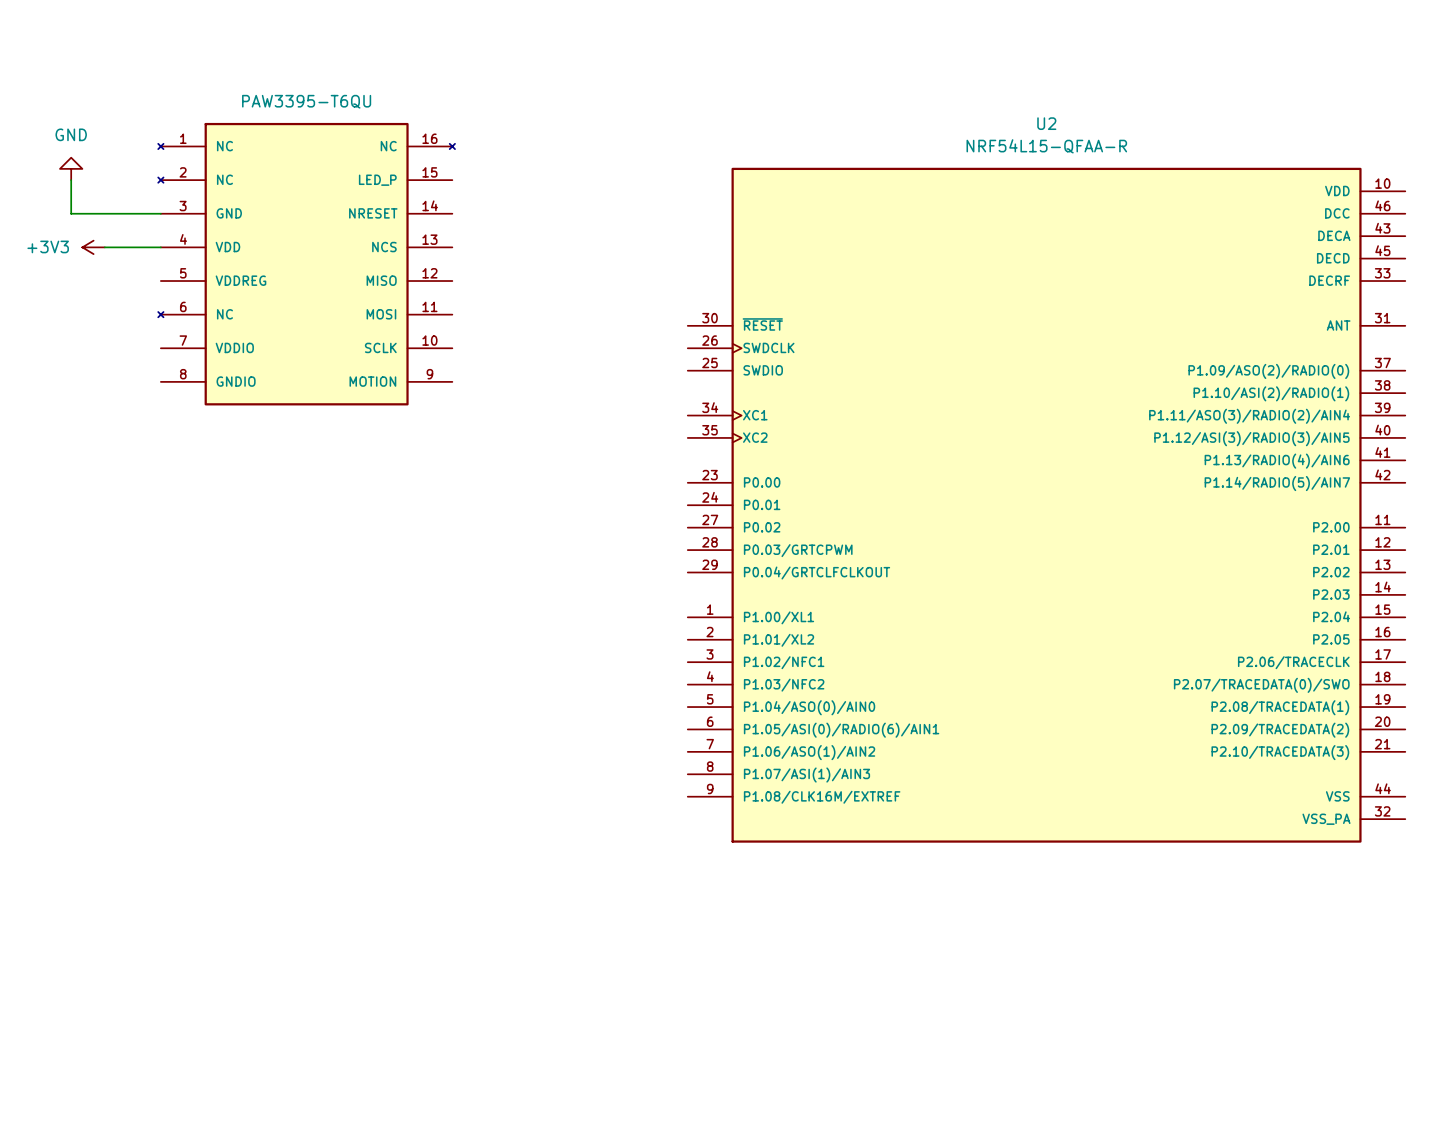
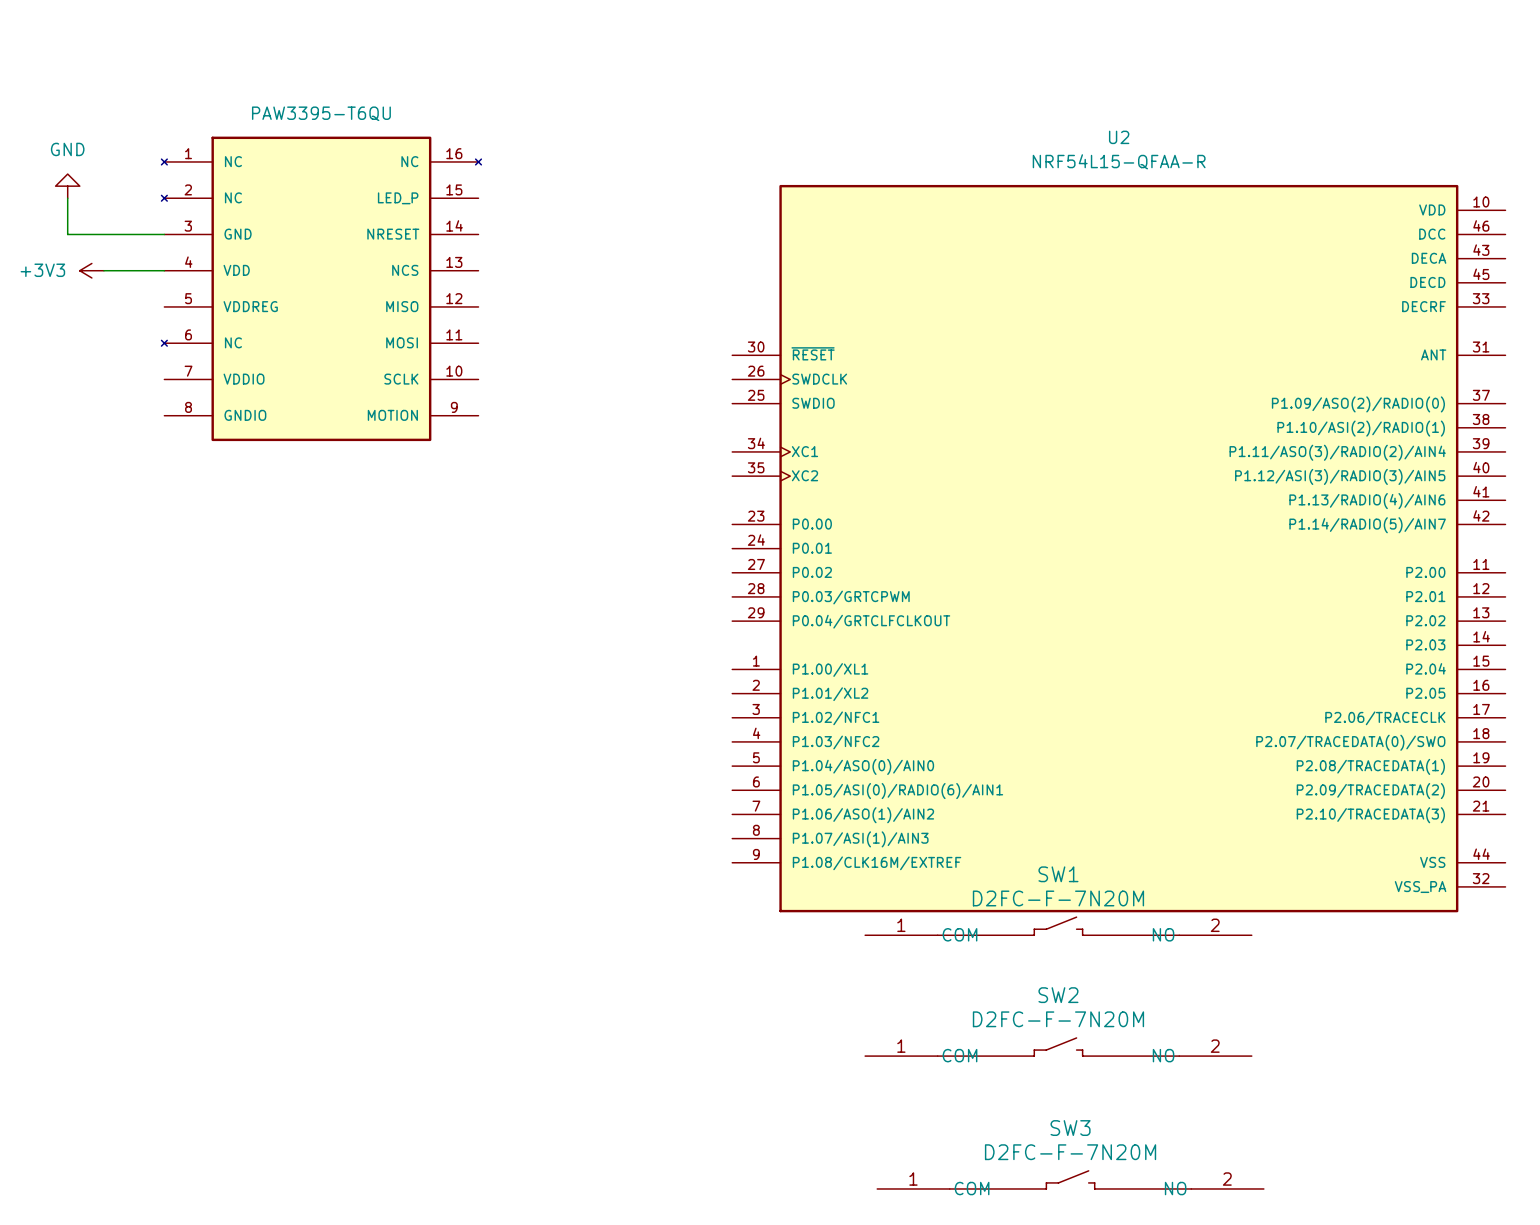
SW1: none -> D2FC-F-7N20M (1058, 926)
SW2: none -> D2FC-F-7N20M (1058, 1047)
SW3: none -> D2FC-F-7N20M (1070, 1179)

